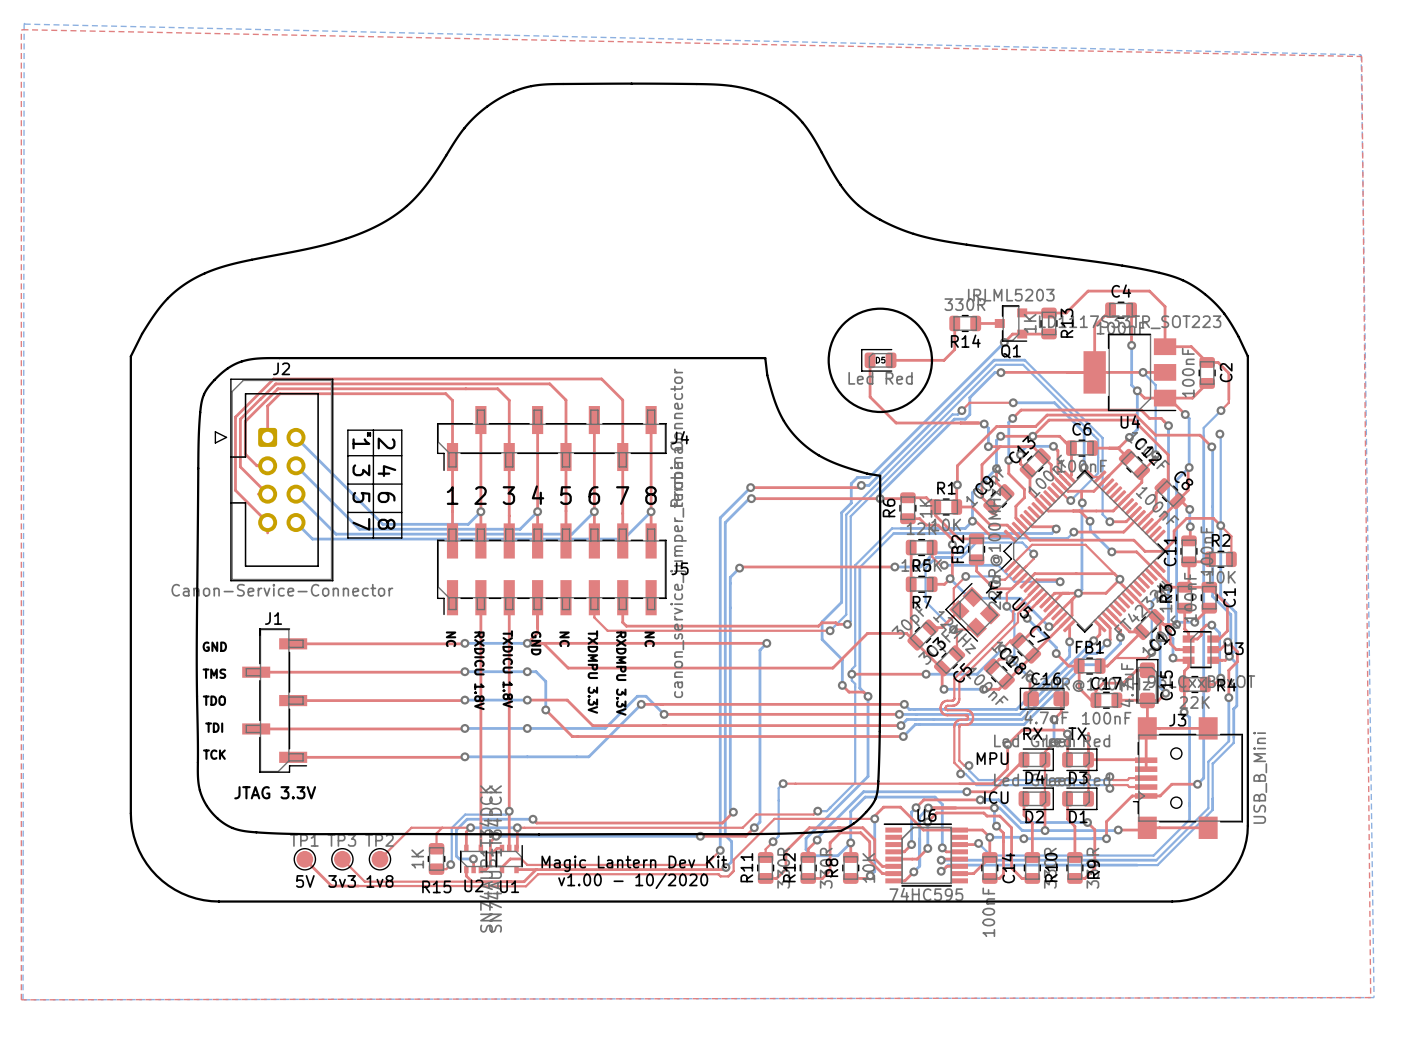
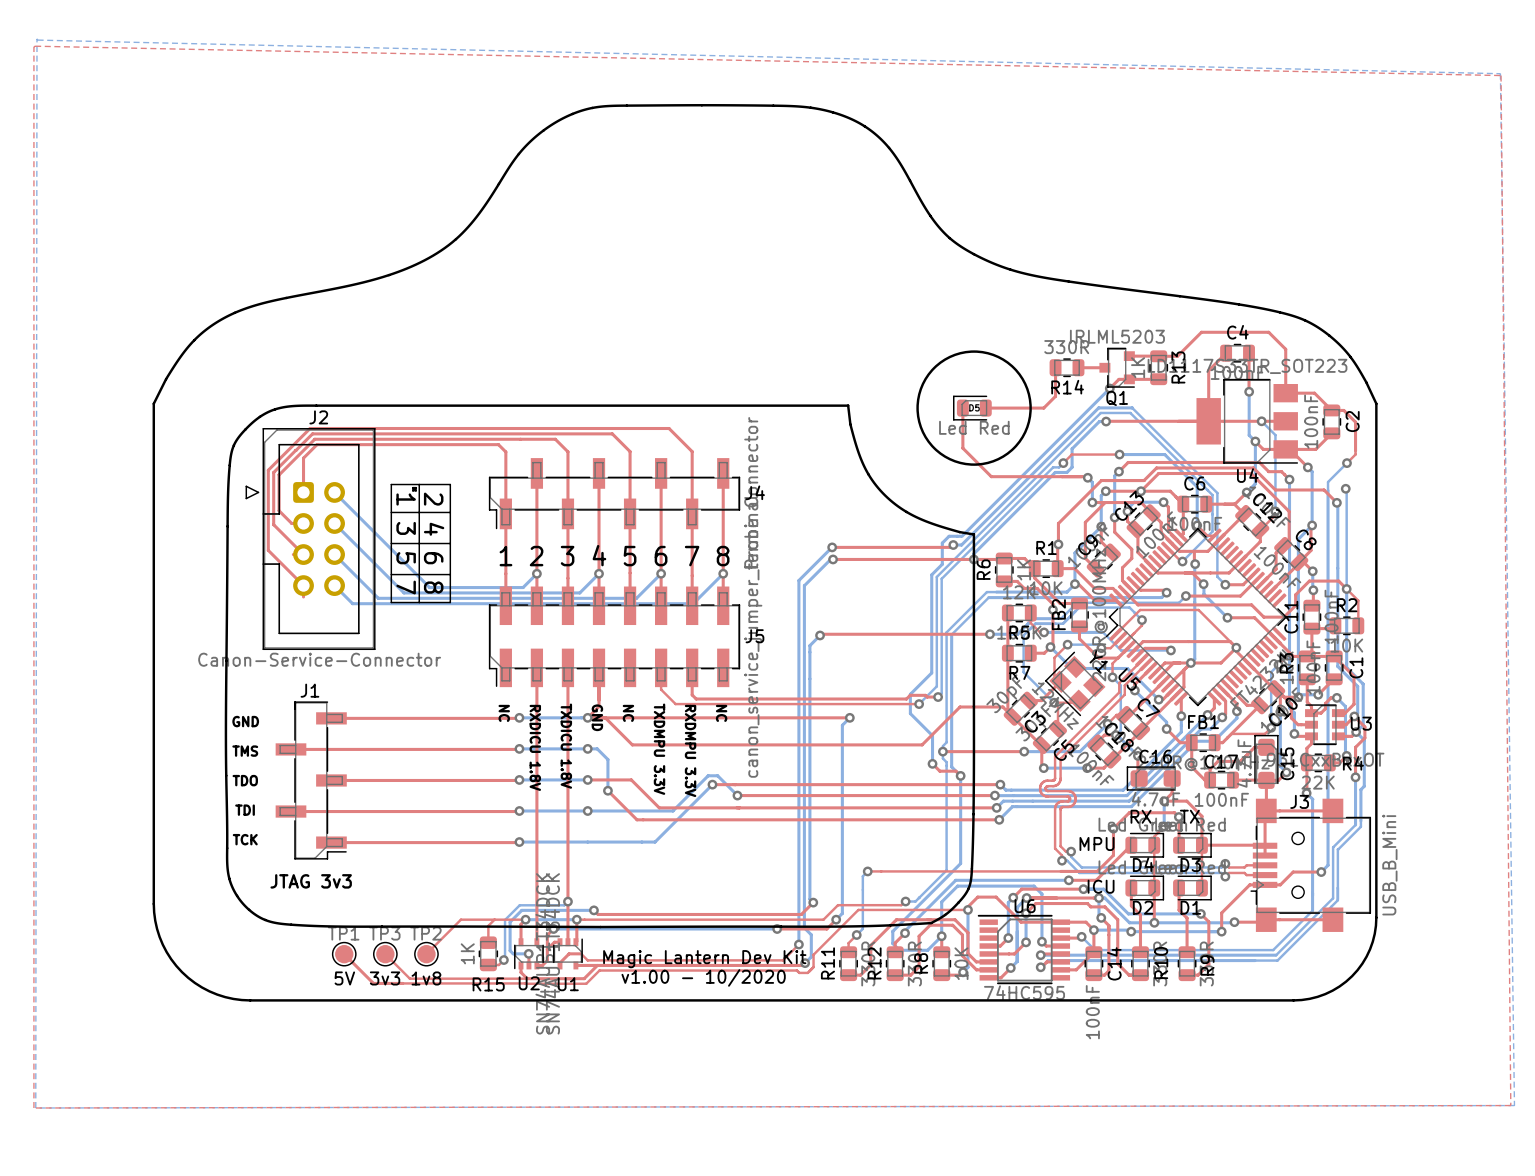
top track: none -> (1164, 801) (1186, 801) (1201, 816)
J1 value: JTAG 3.3V (275, 792) -> JTAG 3v3 (311, 881)

